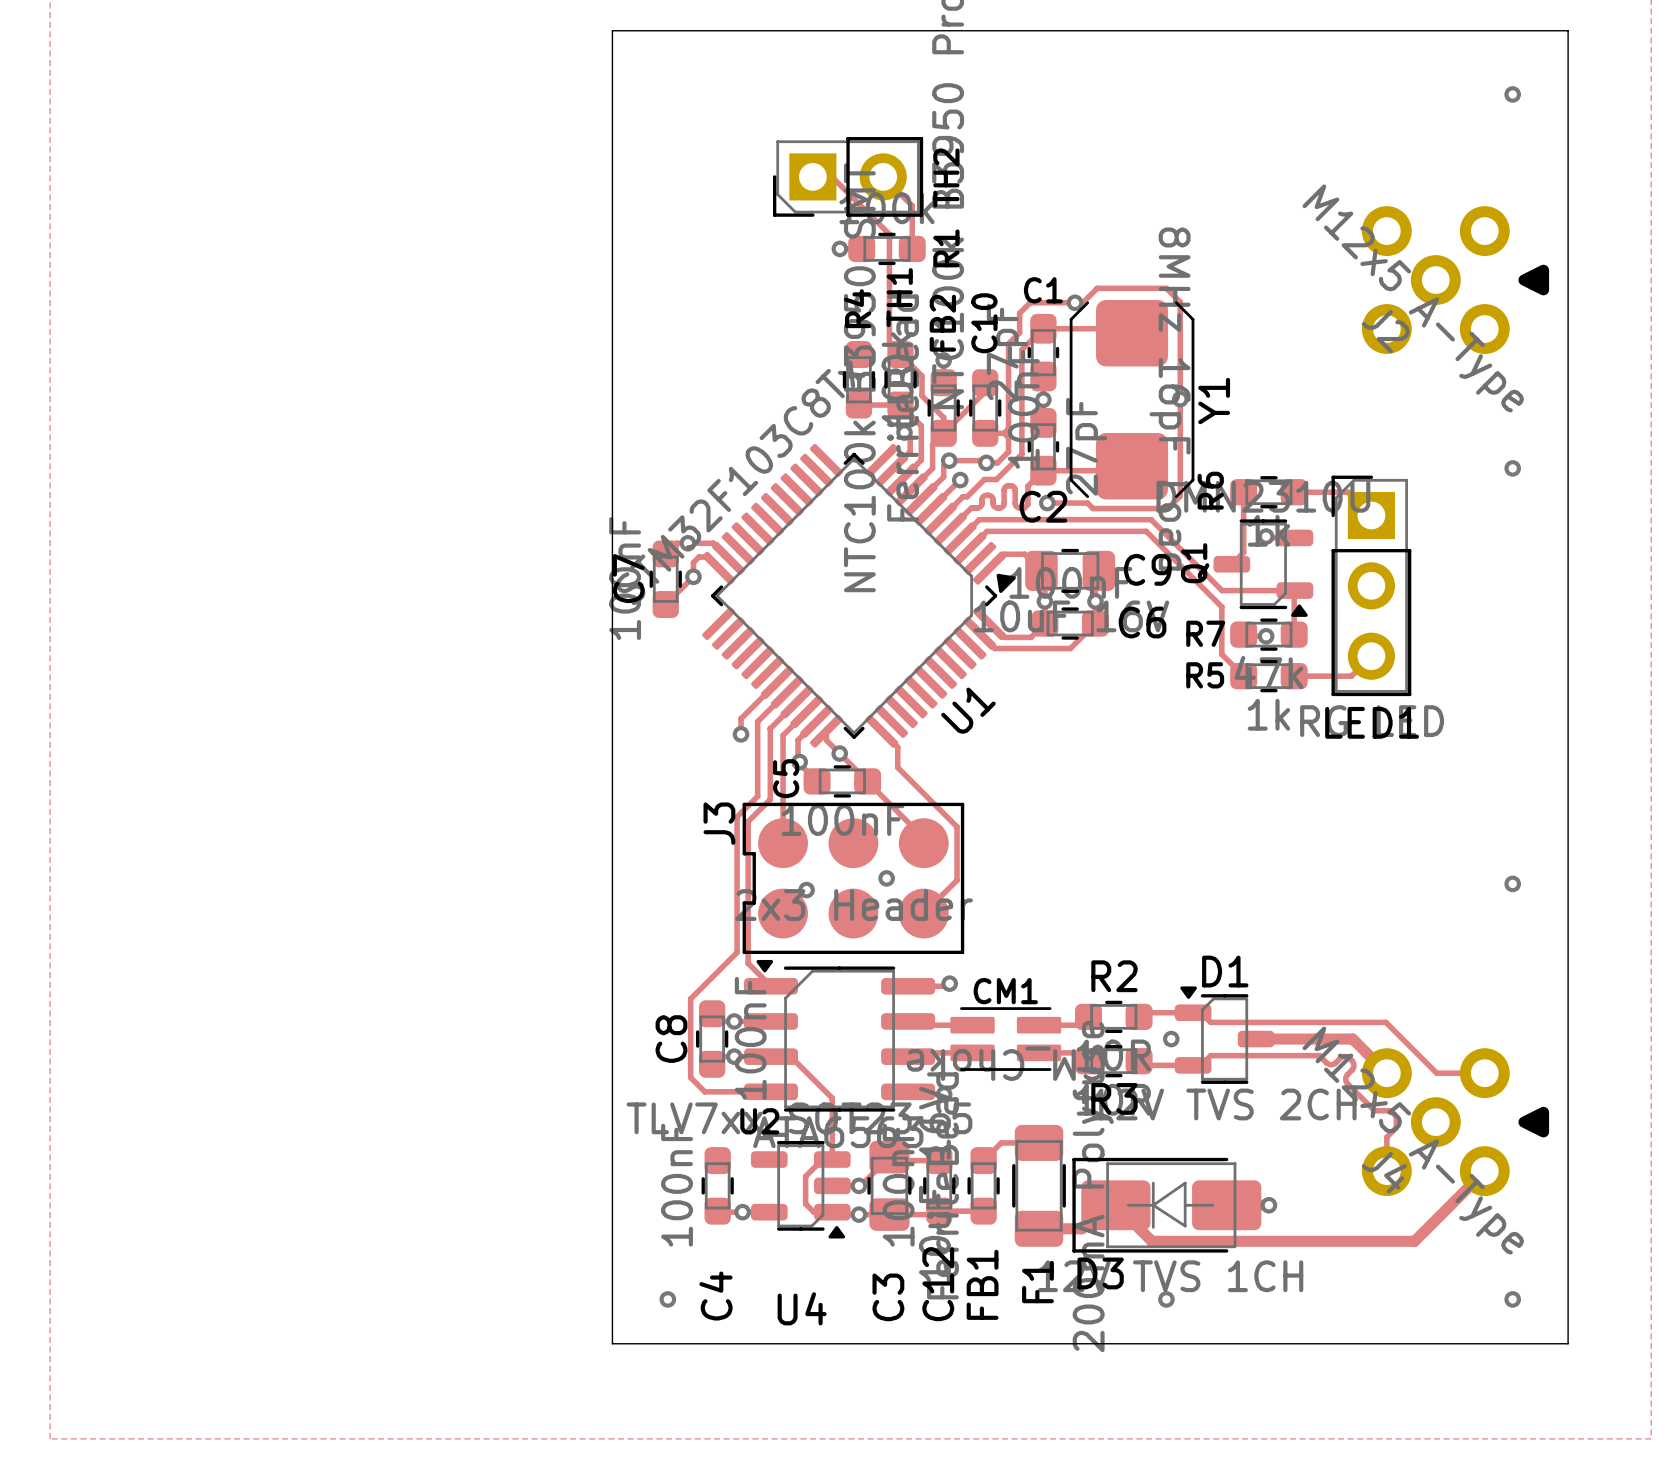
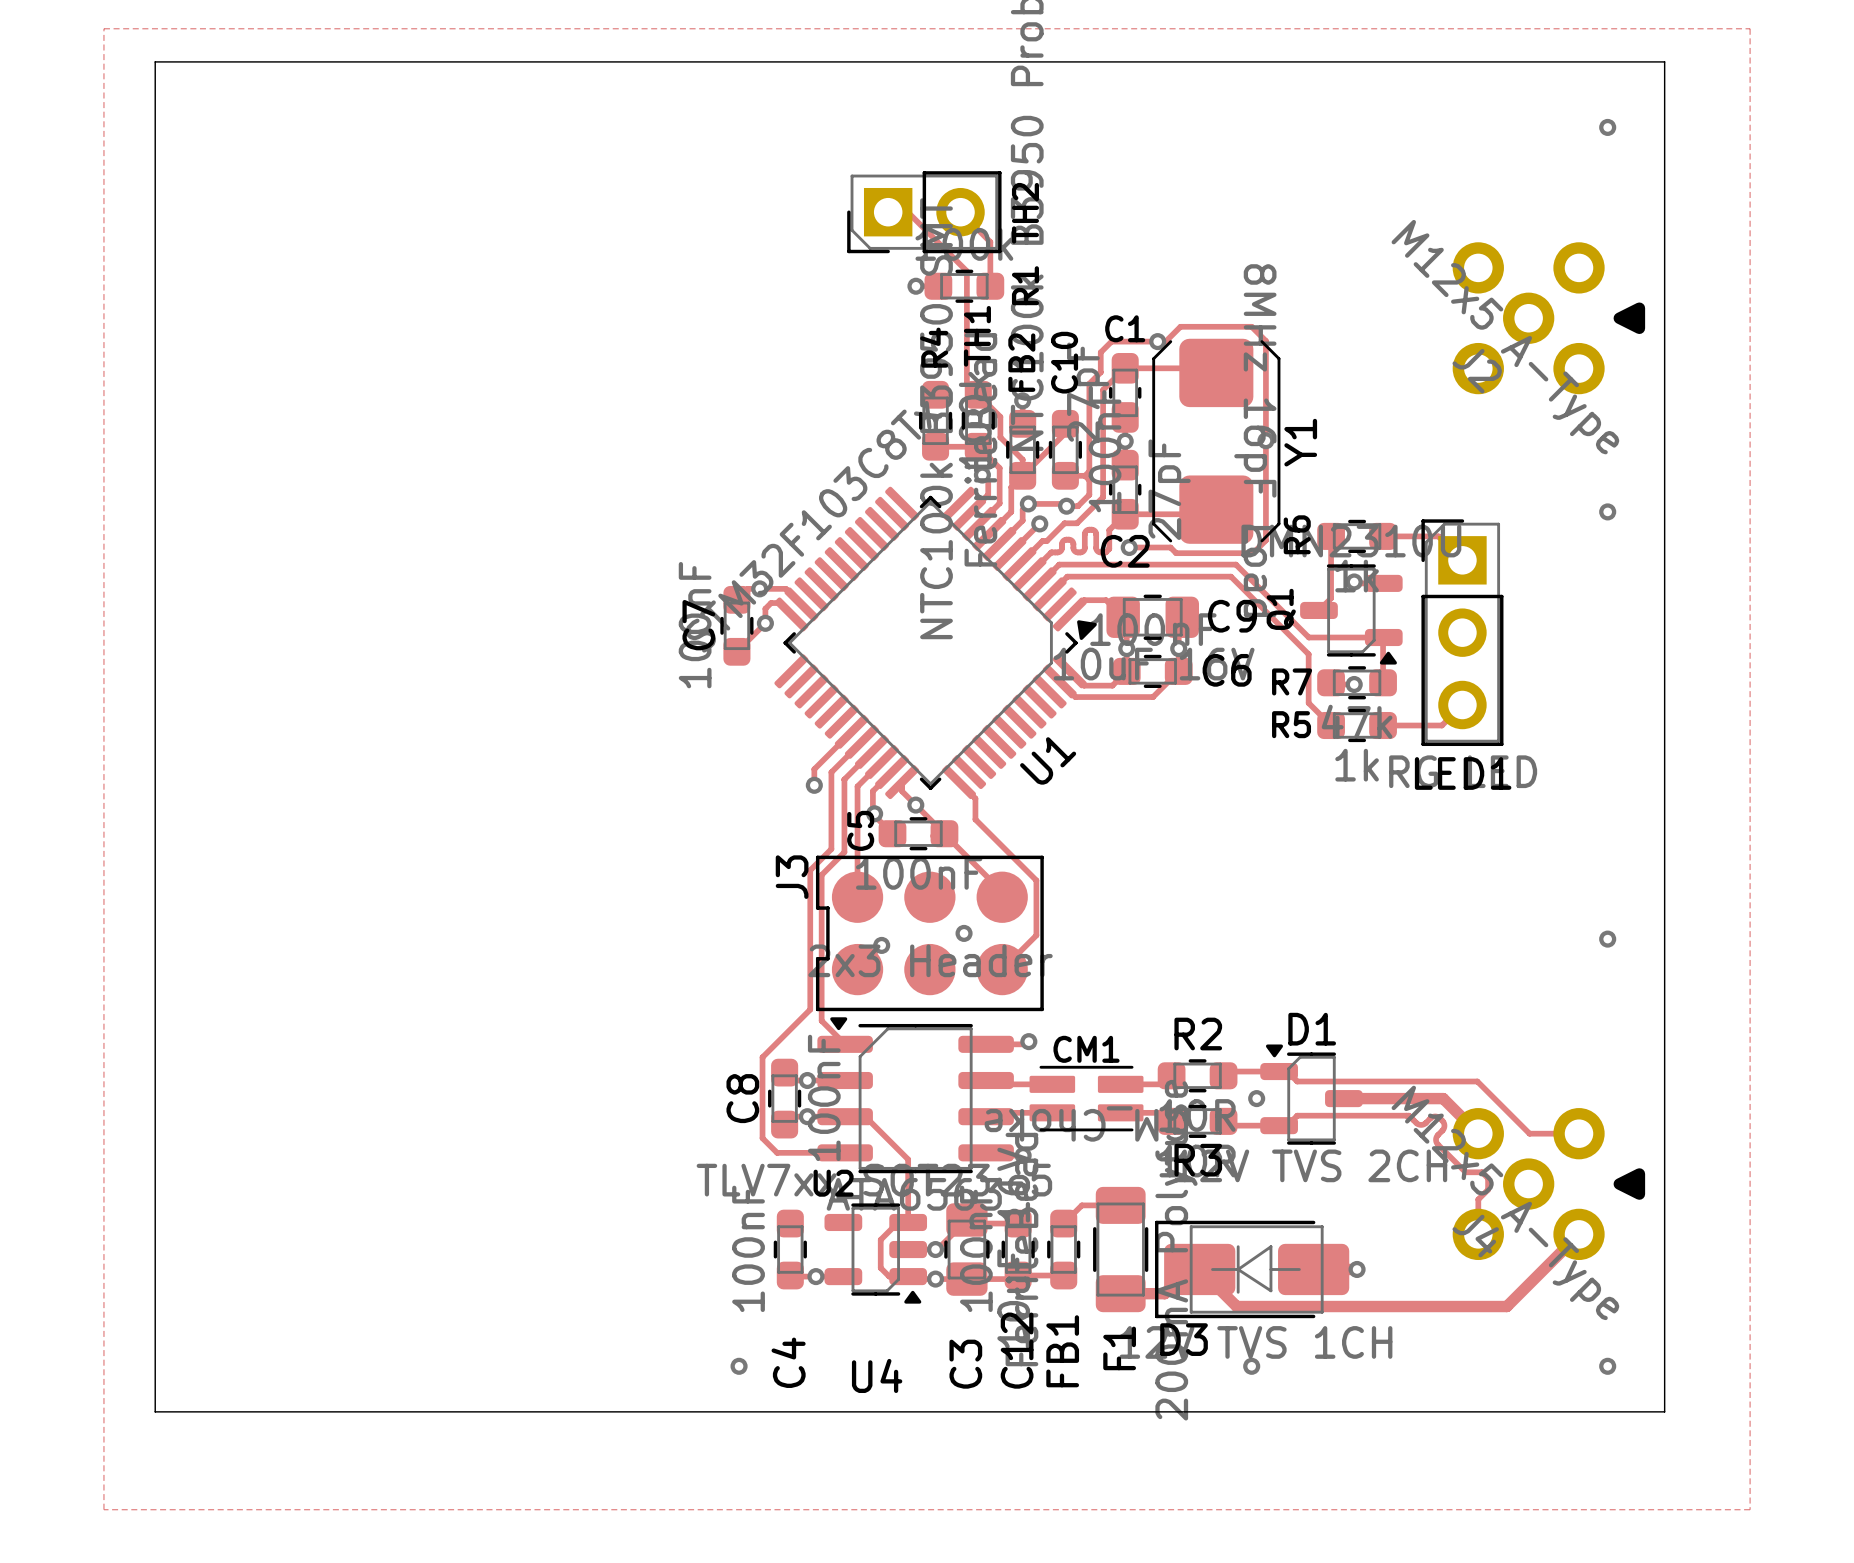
board edge: (612, 30) (612, 1343) -> (682, 61) (155, 61) (155, 1411) (682, 1411)

